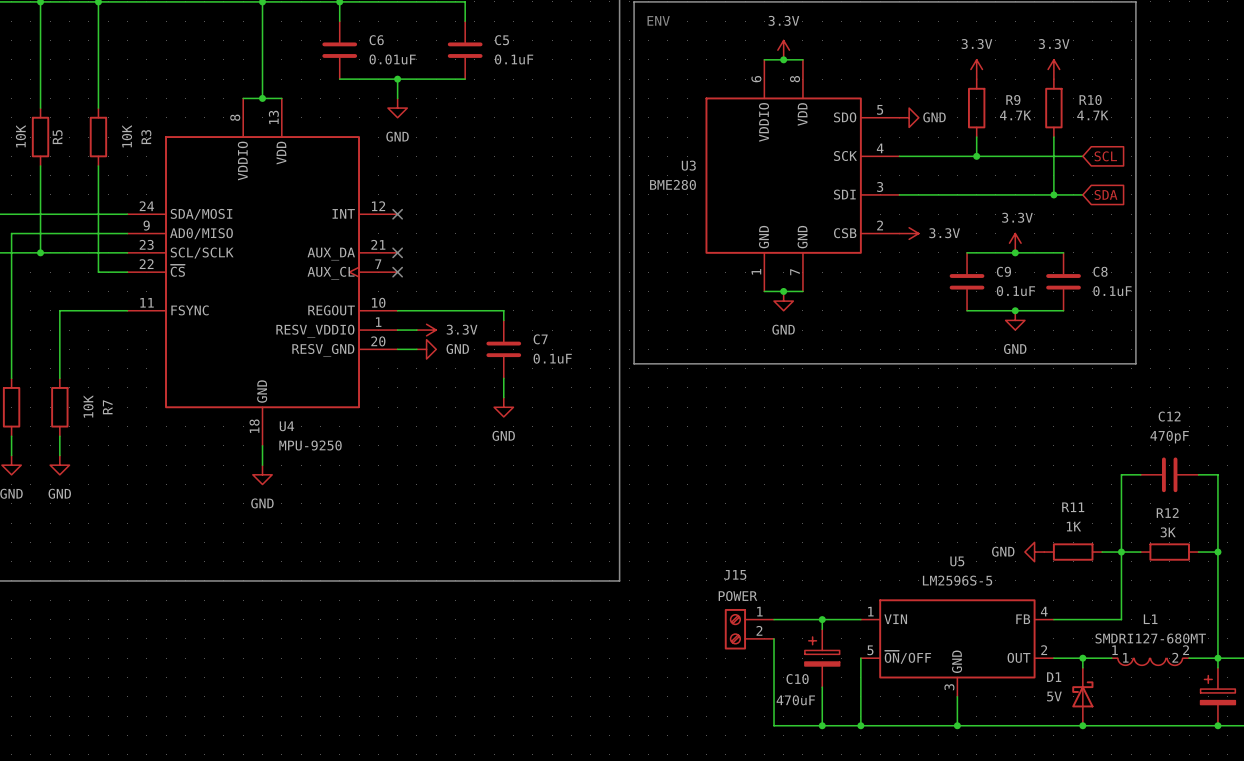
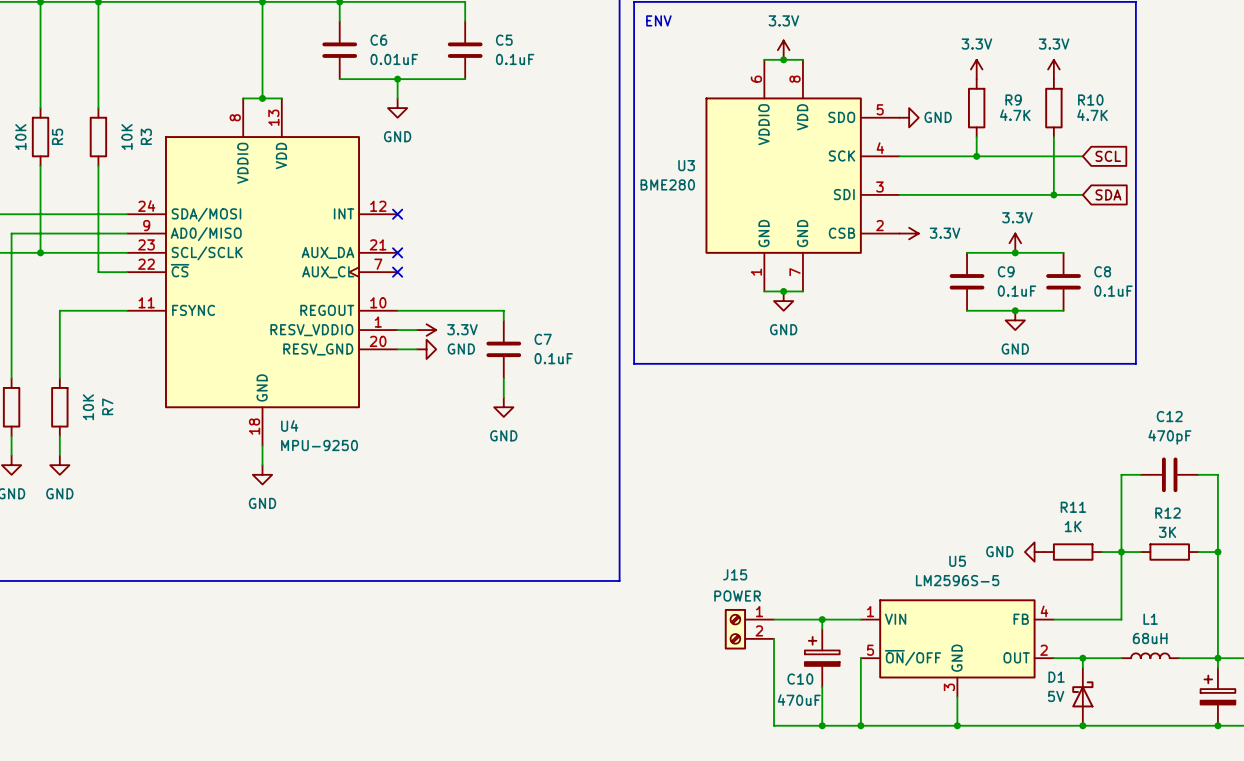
L1 value: SMDRI127-680MT (1150, 638) -> 68uH (1150, 638)
L1 symbol: [1111, 658, 1190, 666] -> [1121, 653, 1180, 659]

